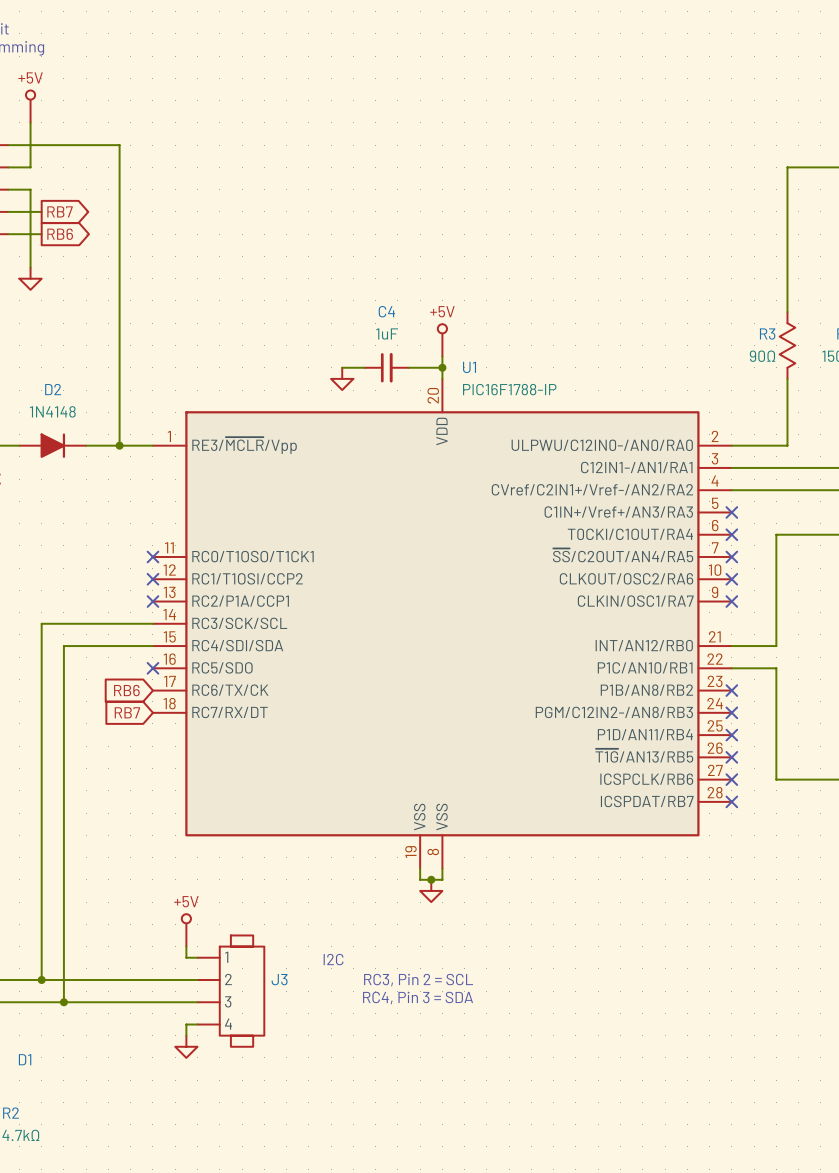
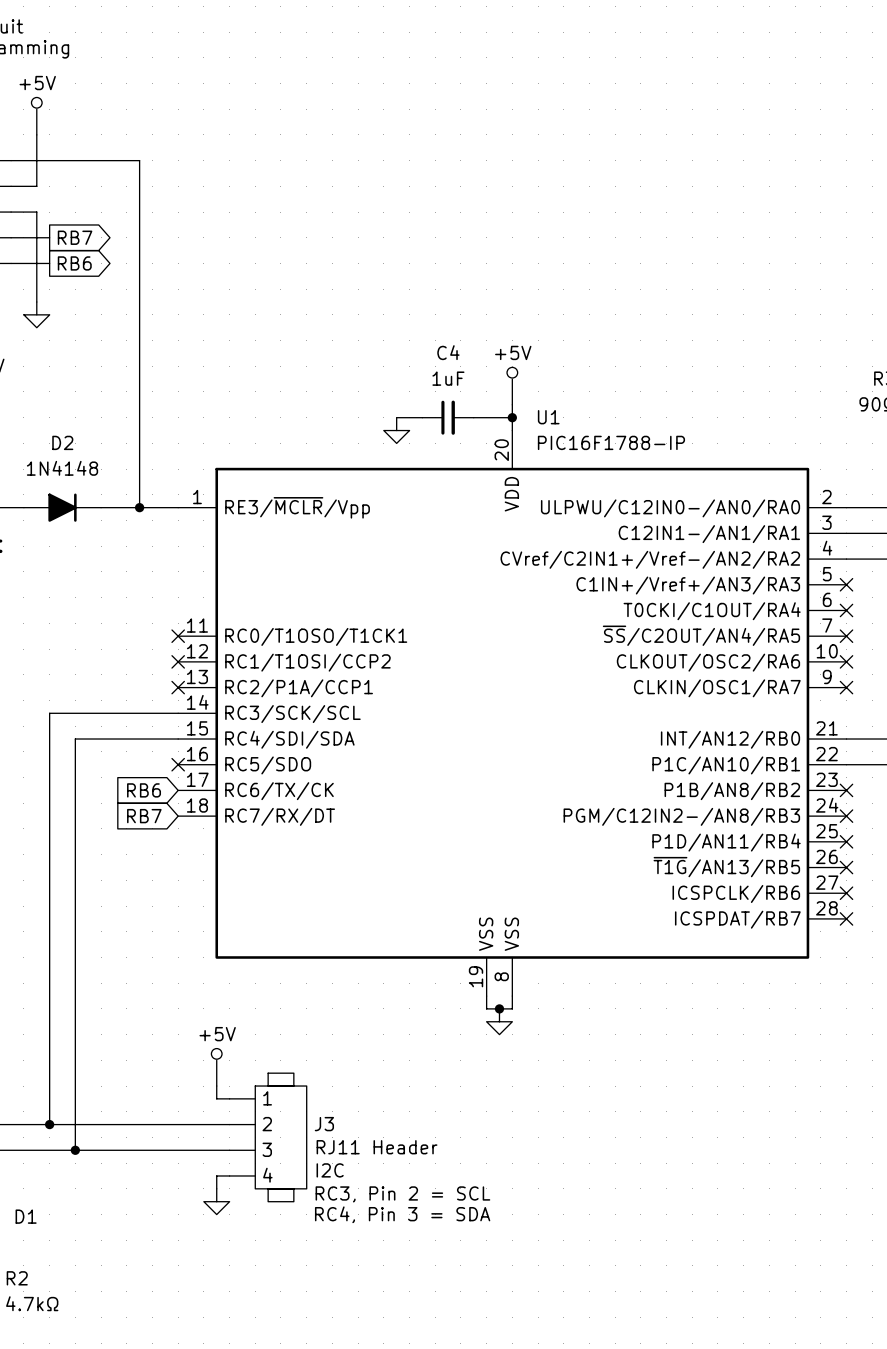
text position: I2C (333, 959) -> I2C (330, 1170)
text position: RC3, Pin 2 = SCL (418, 980) -> RC3, Pin 2 = SCL (402, 1194)
text position: RC4, Pin 3 = SDA (418, 998) -> RC4, Pin 3 = SDA (402, 1214)
J3 value: none -> RJ11 Header (377, 1147)

